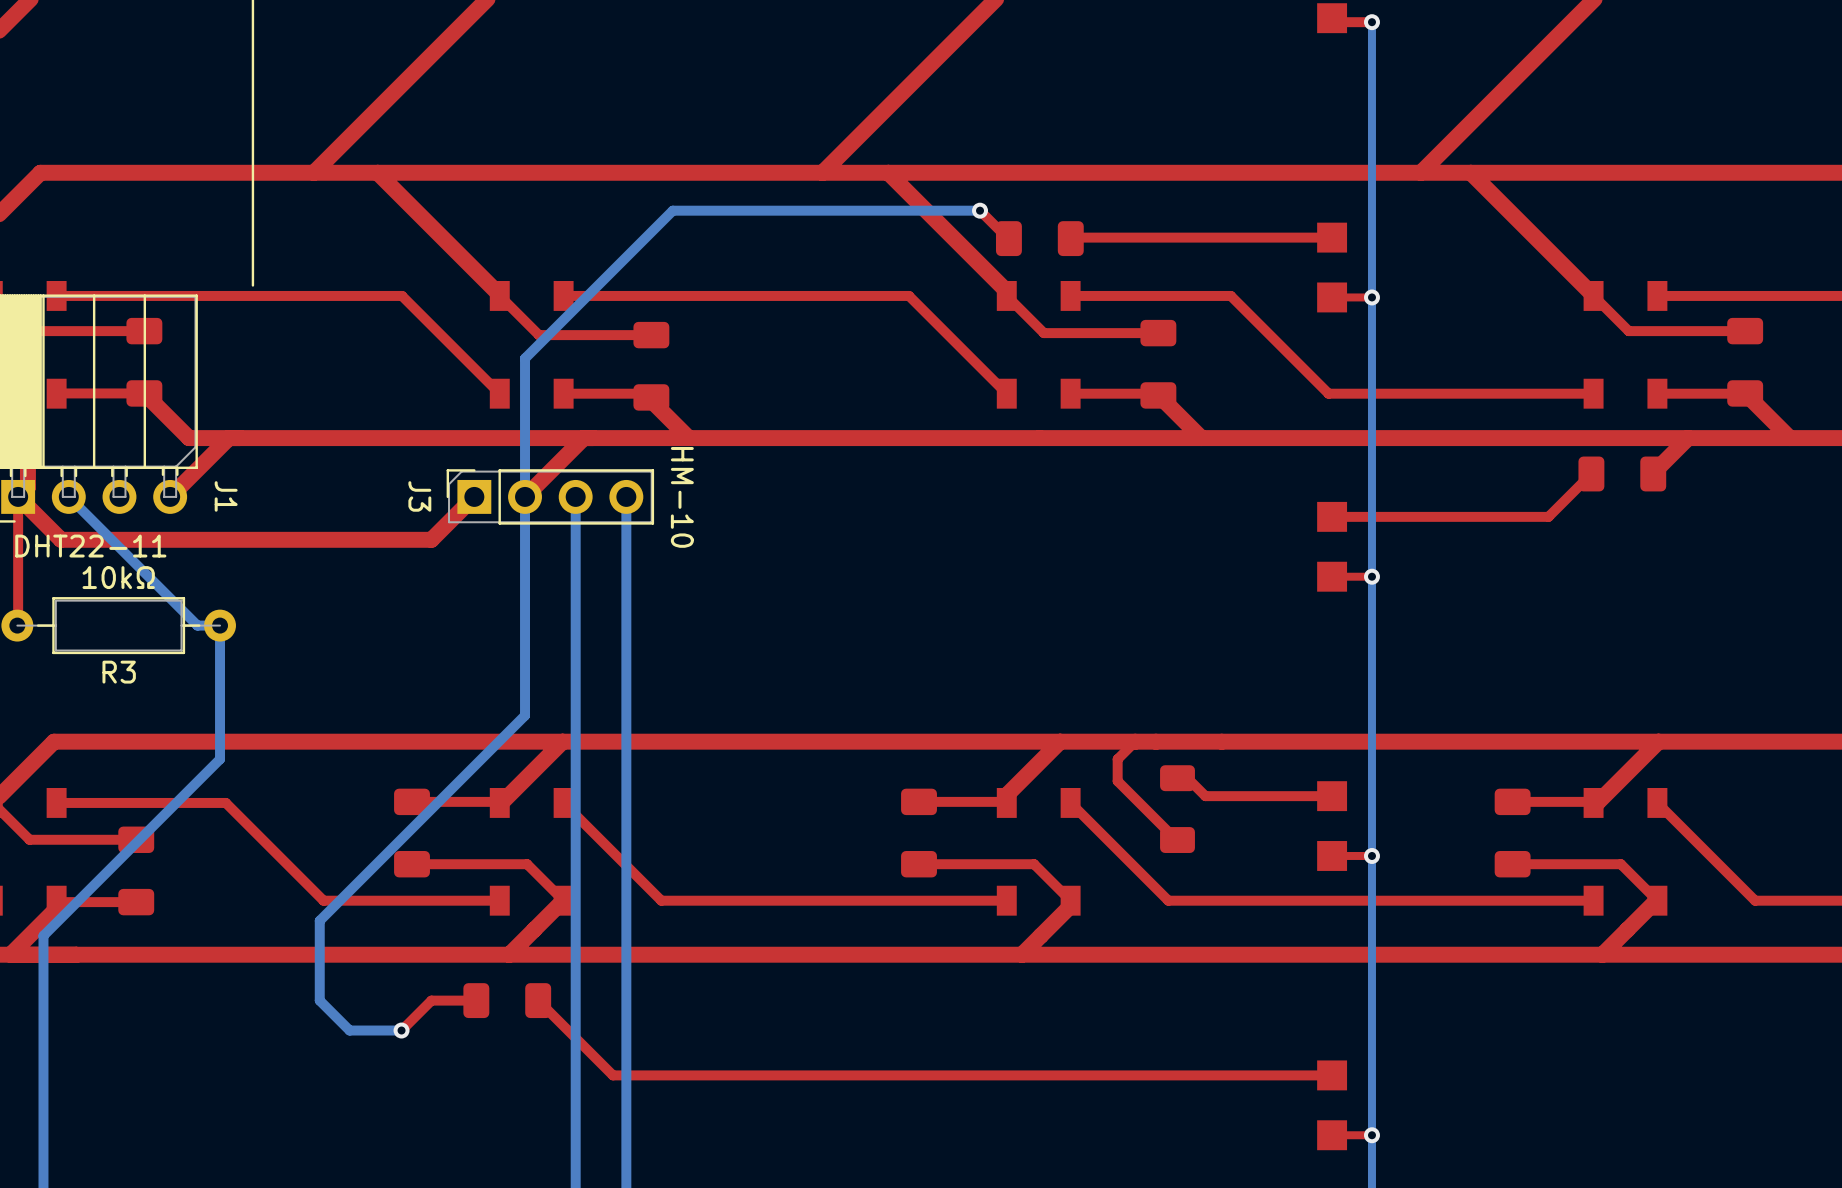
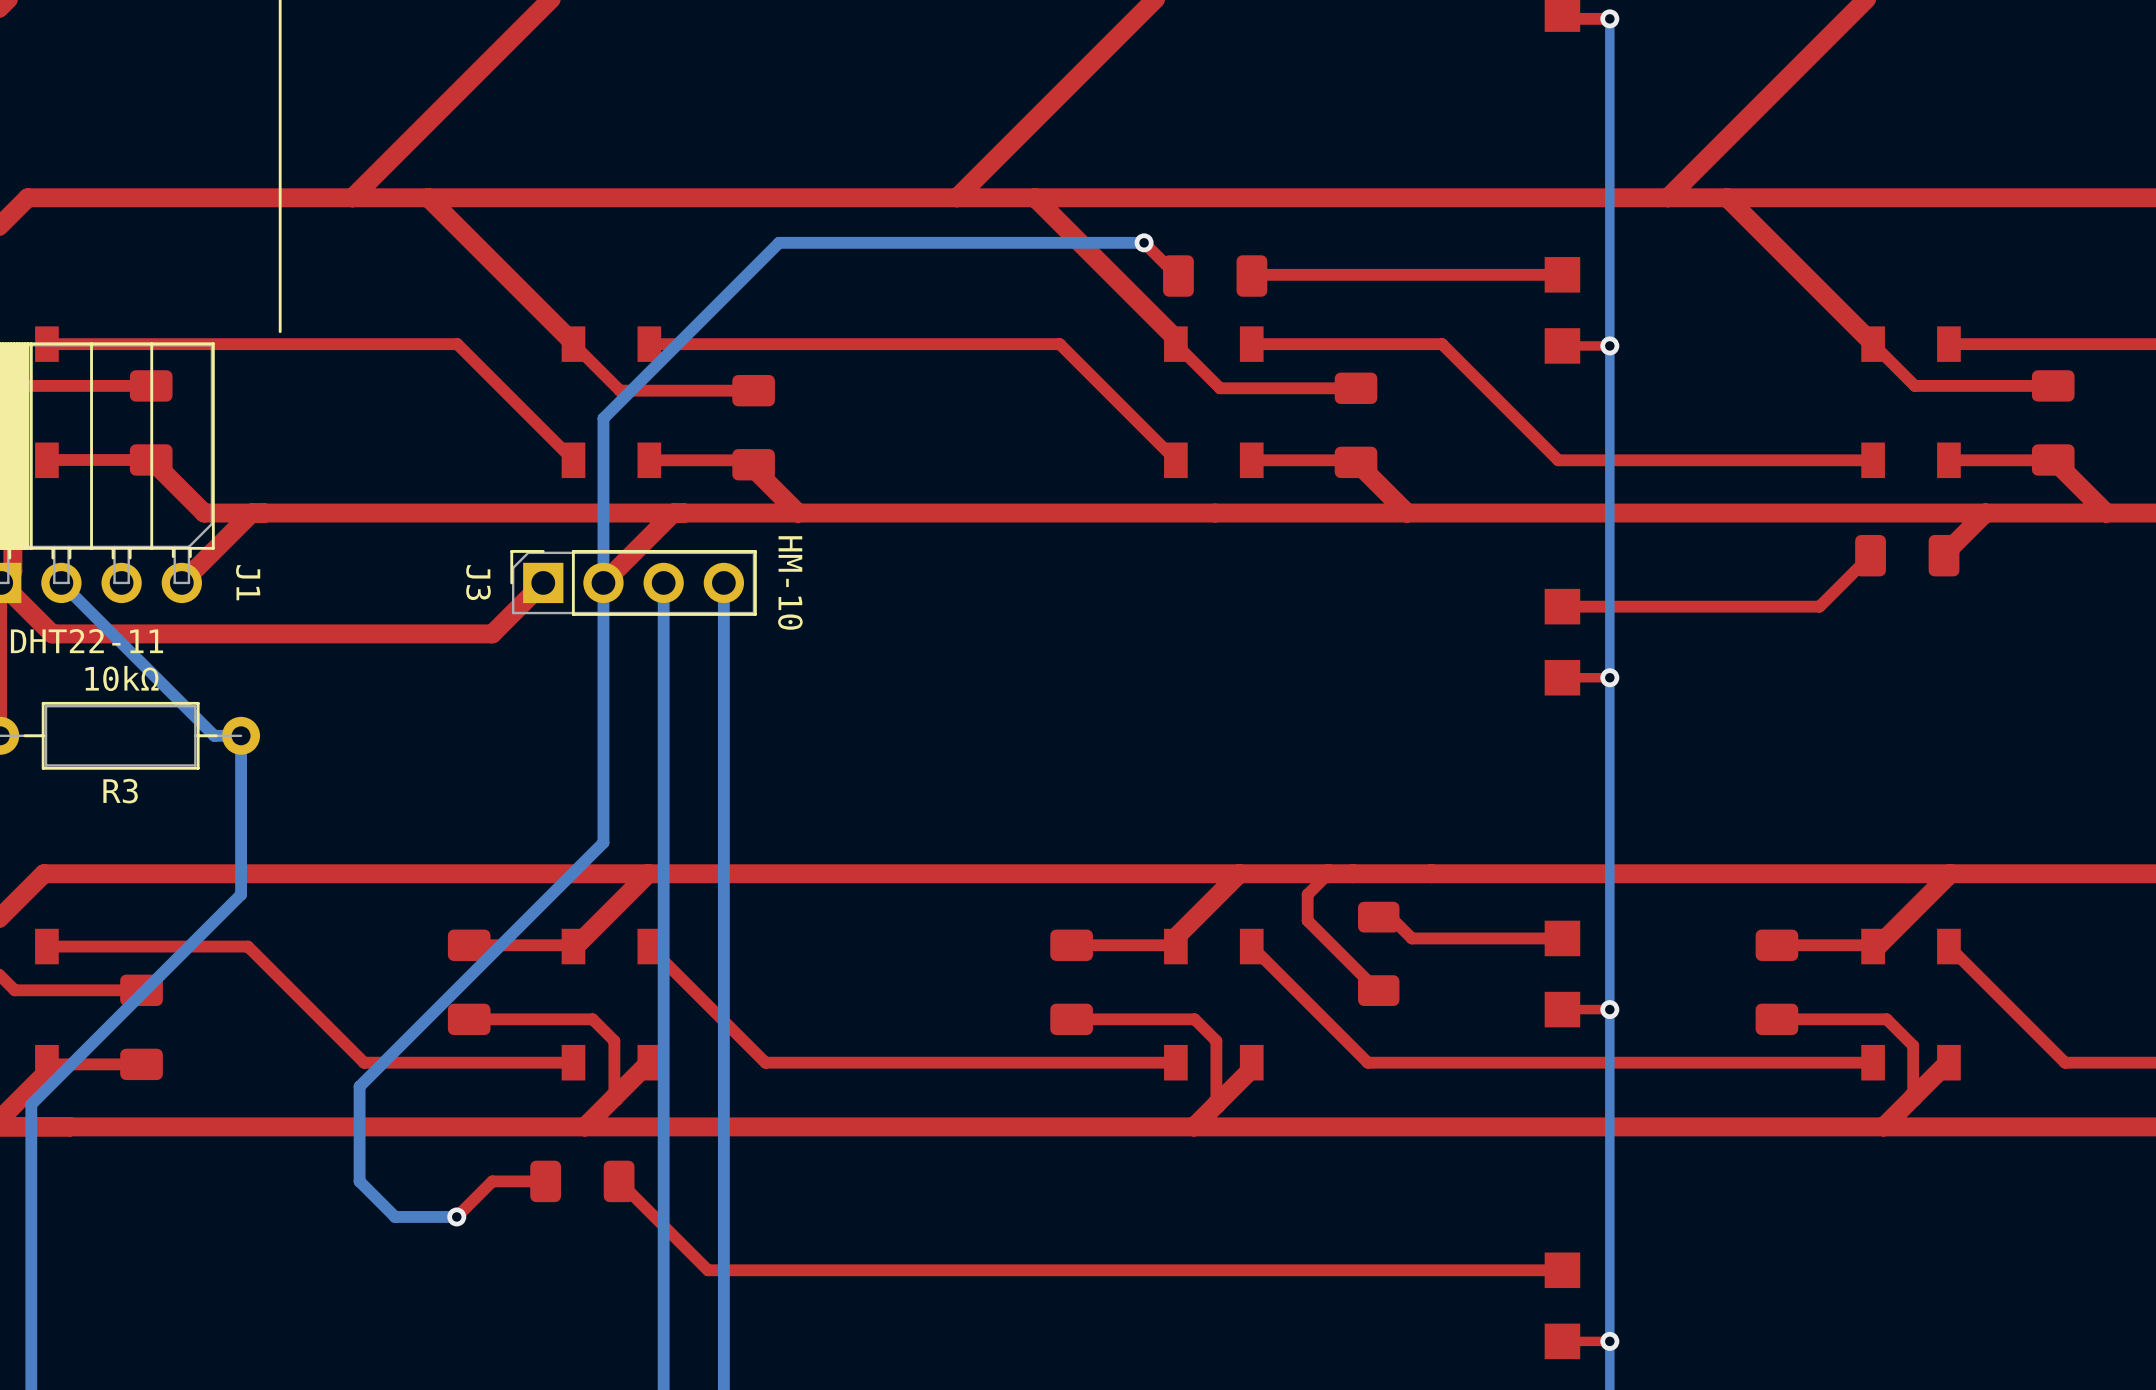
top track: (515, 864) (527, 864) (563, 900) -> (592, 1019) (614, 1040) (614, 1097)
top track: (1022, 864) (1034, 864) (1070, 900) -> (1194, 1019) (1216, 1040) (1216, 1104)
top track: (1605, 864) (1620, 864) (1657, 900) -> (1886, 1019) (1913, 1045) (1913, 1097)

